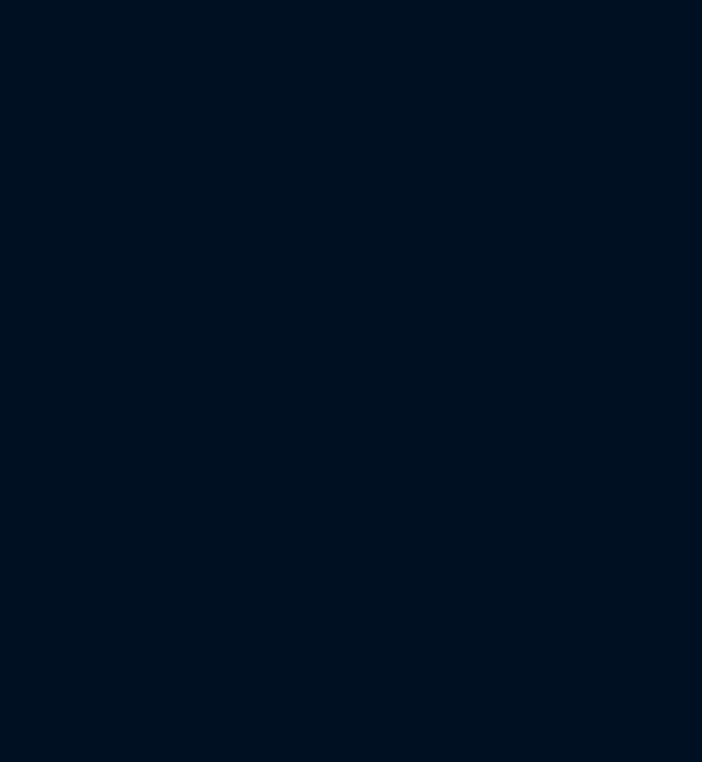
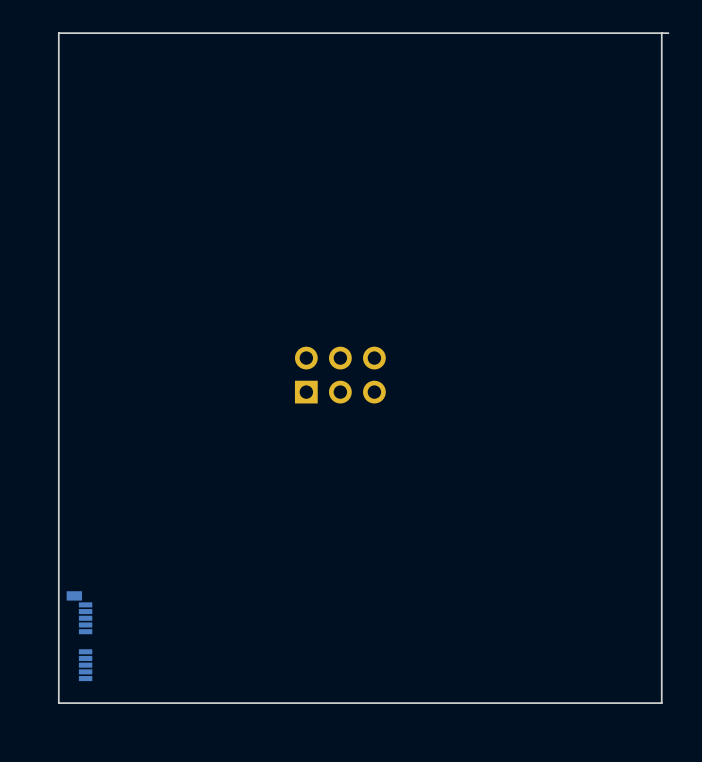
board edge: none -> (668, 33) (58, 33) (58, 703) (661, 703) (661, 33)
part: none -> (340, 375)
part: none -> (79, 636)

